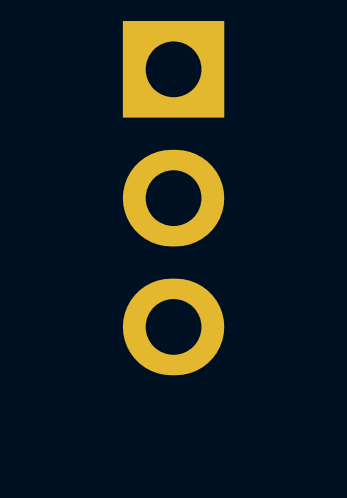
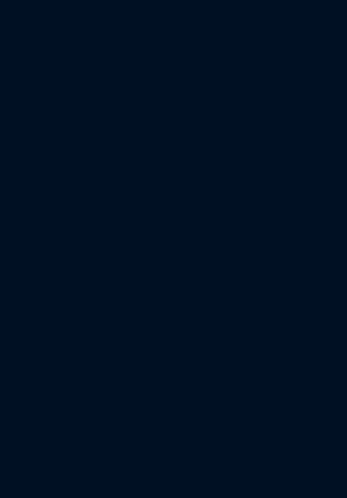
part: (173, 198) -> none

